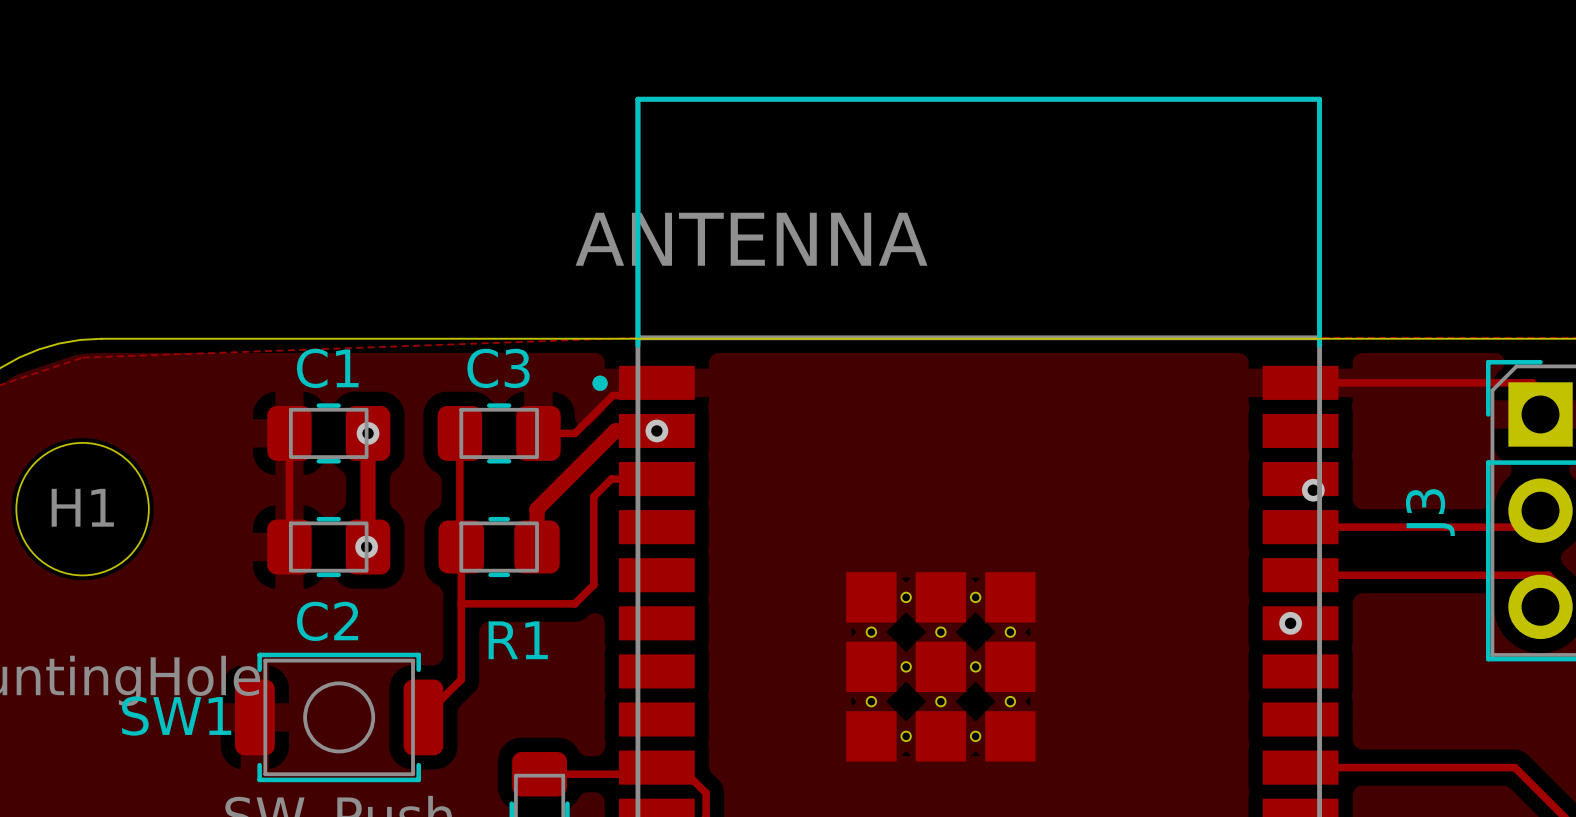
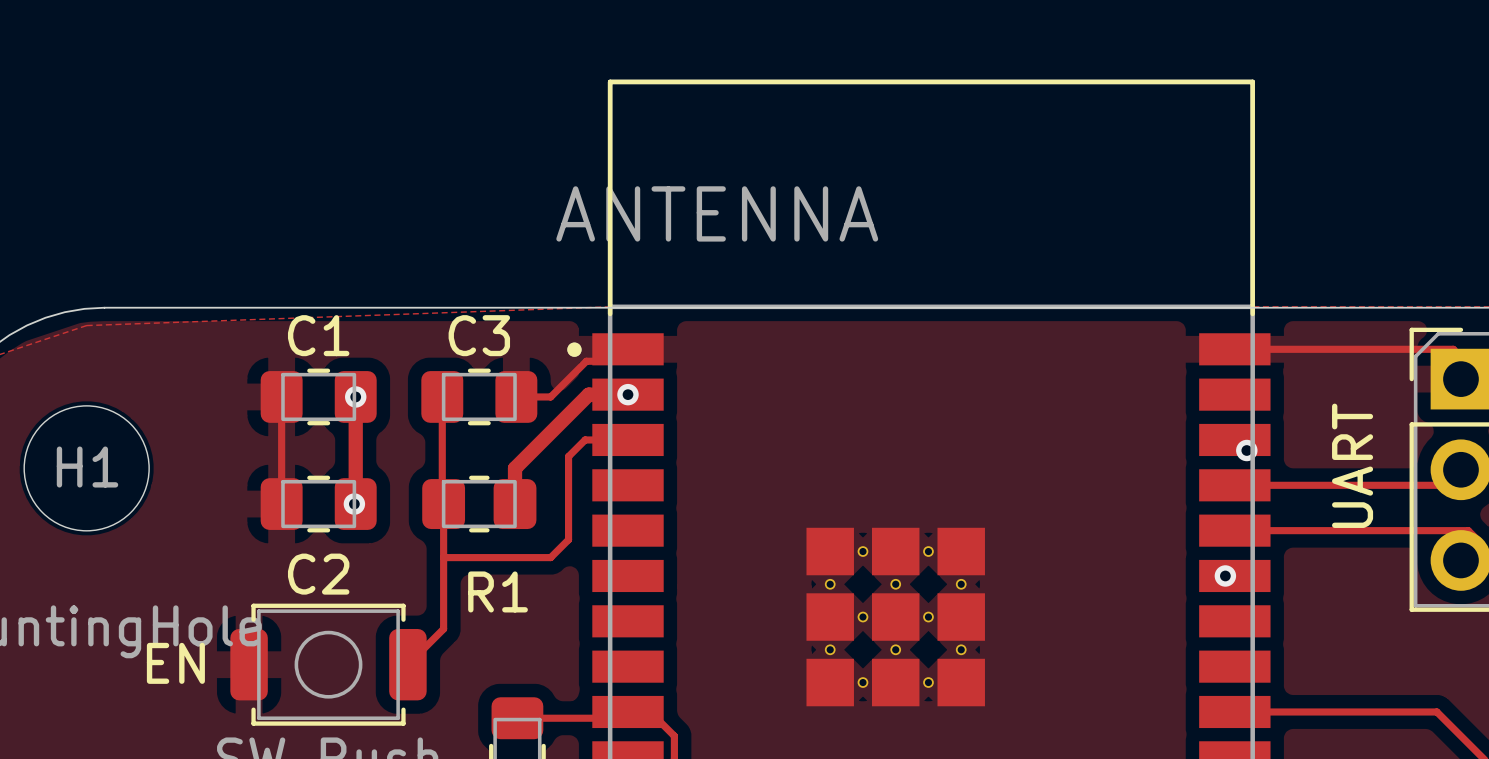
J3 name: J3 (1430, 512) -> UART (1352, 465)
SW1 name: SW1 (176, 716) -> EN (175, 663)

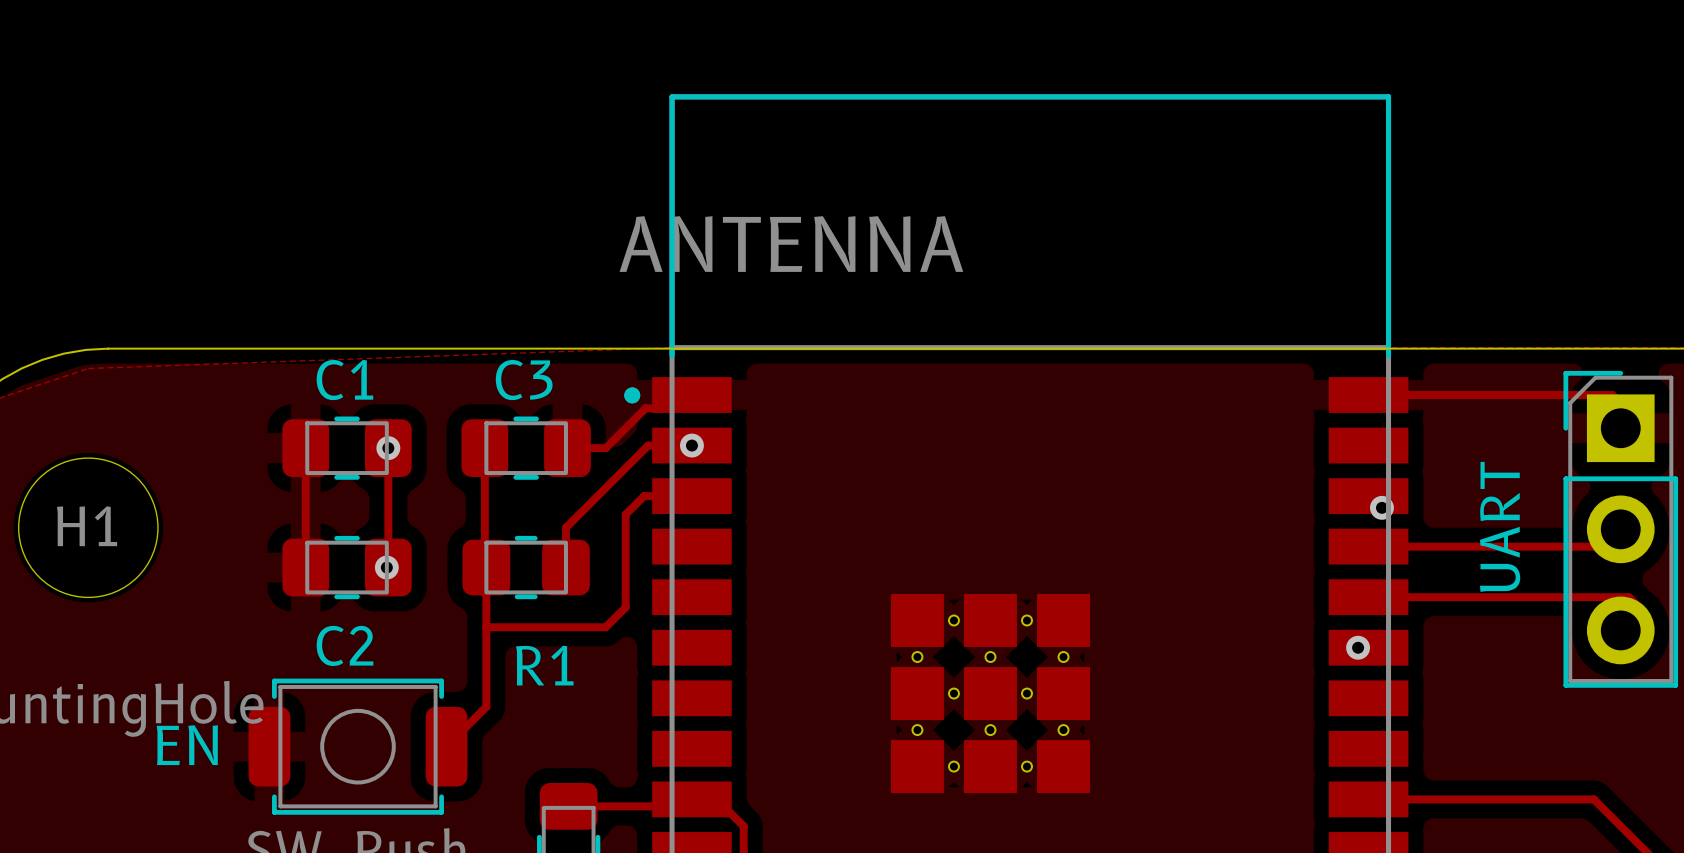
track width: thick (628, 394) (588, 394) (515, 468) (515, 504) -> thin (691, 445) (648, 445) (565, 527) (565, 567)
track width: thick (355, 396) (355, 521) -> thin (388, 448) (388, 587)

